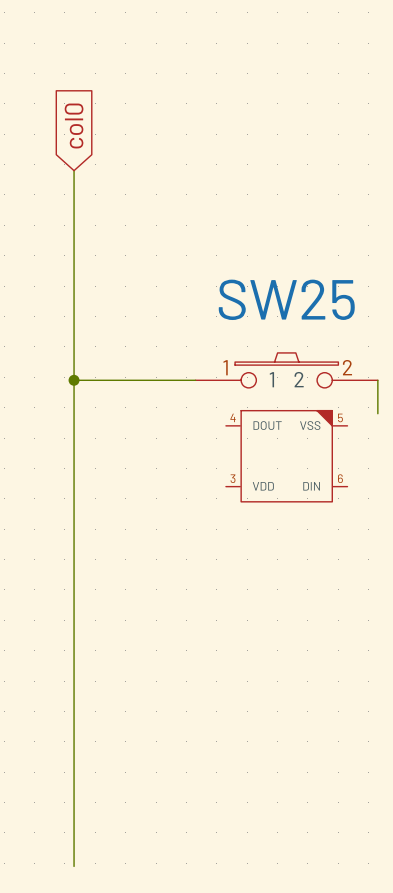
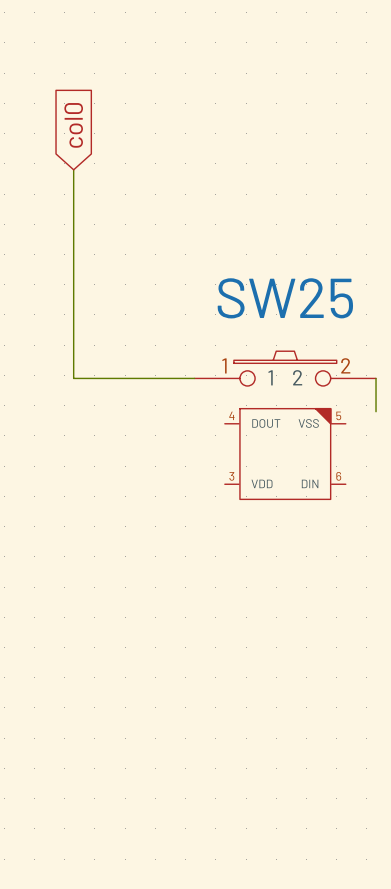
wire: (74, 380) (74, 866) -> none
junction: (74, 380) -> none

